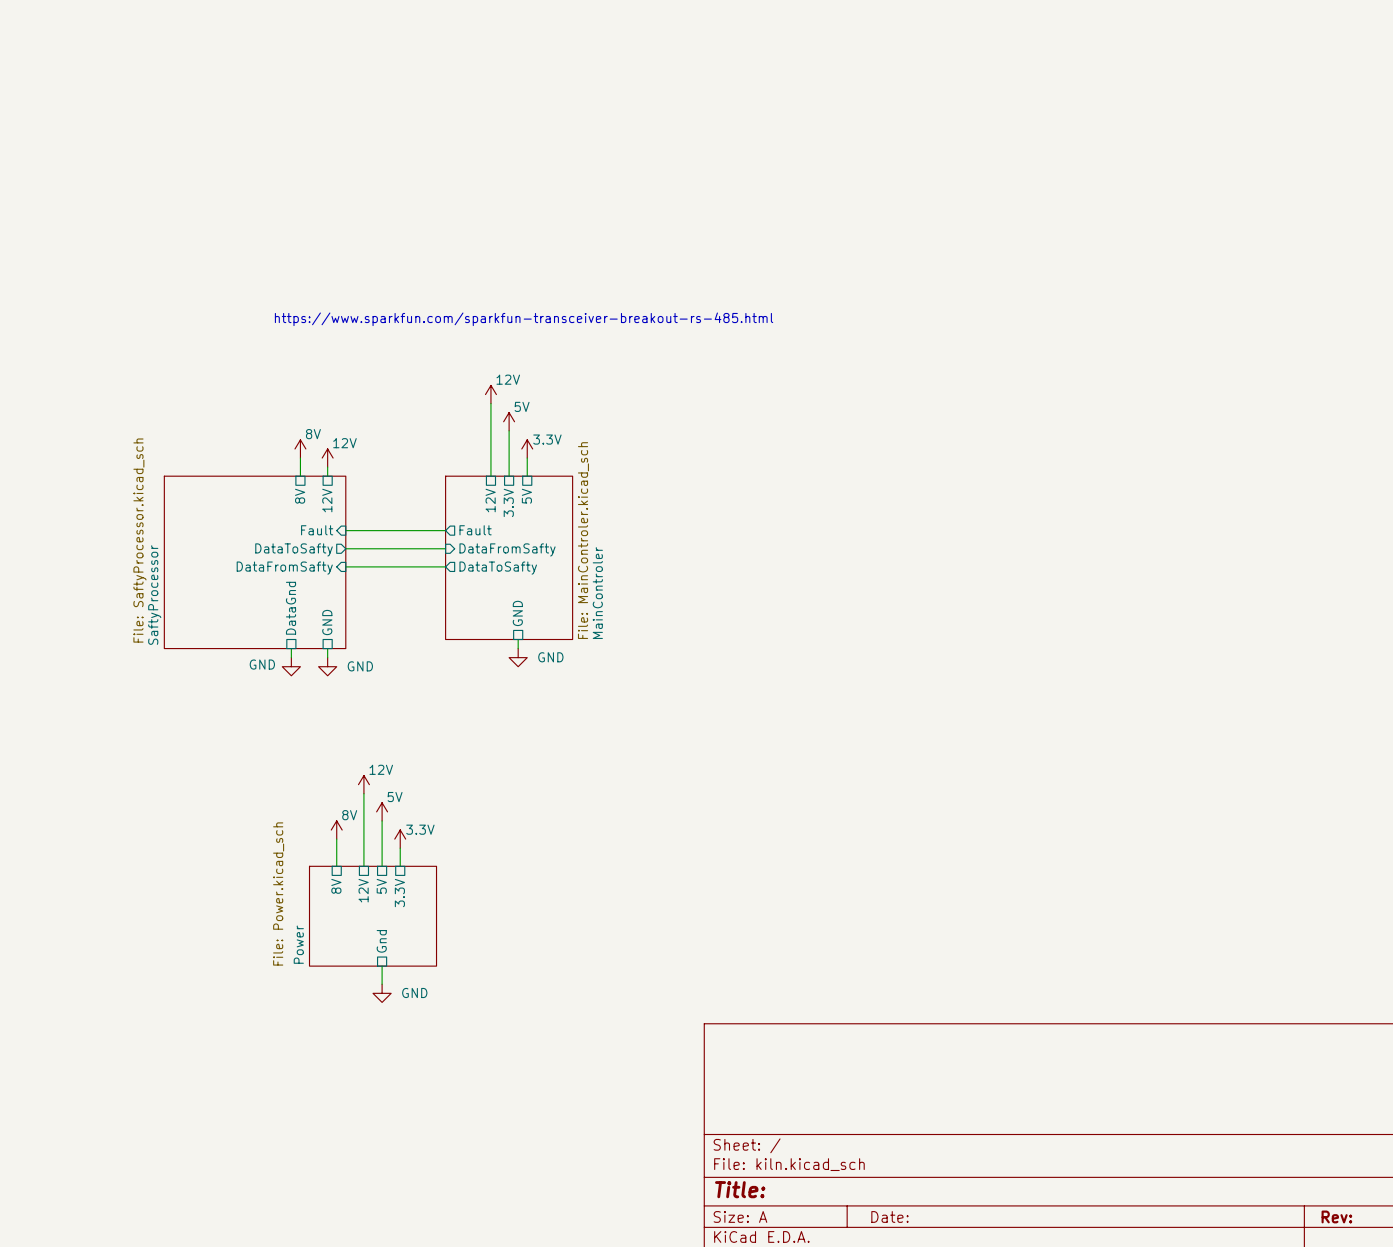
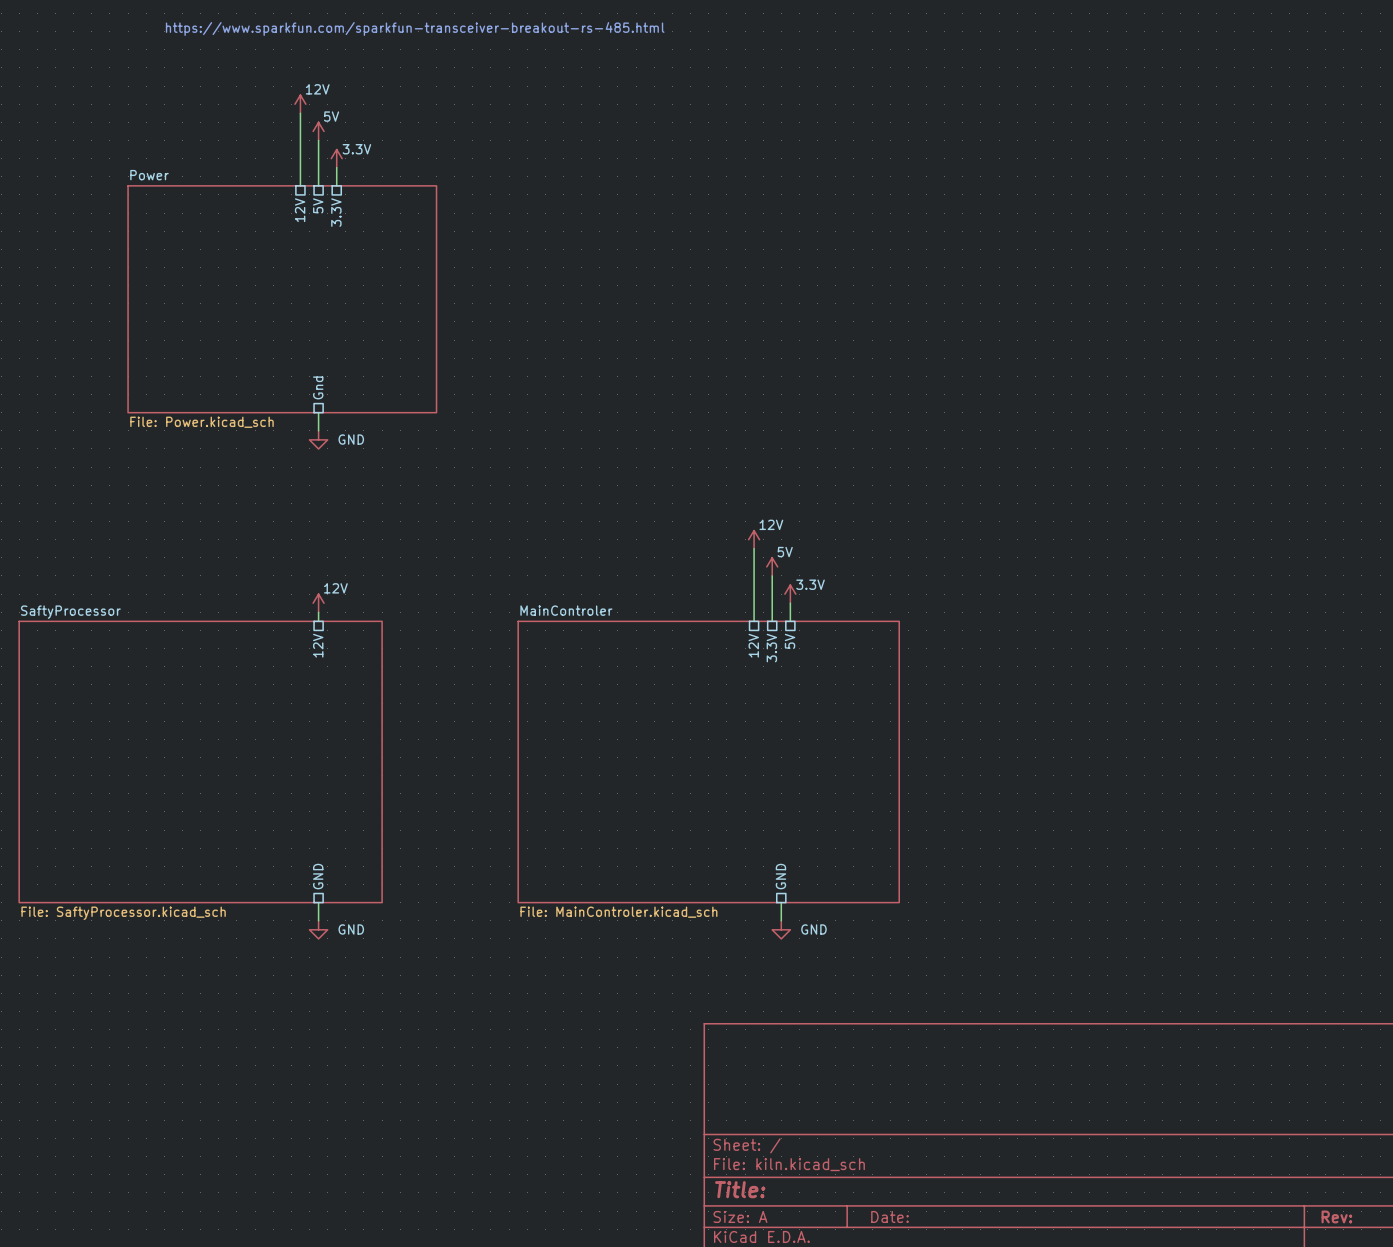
text: none -> https://www.sparkfun.com/sparkfun-transceiver-breakout-rs-485.html (415, 28)
power symbol: none -> 12V (300, 104)
wire: none -> (300, 113) (300, 185)
power symbol: none -> 5V (318, 131)
wire: none -> (318, 140) (318, 185)
power symbol: none -> 3.3V (336, 158)
wire: none -> (336, 167) (336, 185)
sheet pin: none -> 5V (318, 205)
sheet pin: none -> 12V (300, 210)
sheet pin: none -> 3.3V (336, 212)
sheet Power: none -> File: Power.kicad_sch (282, 299)
text: https://www.sparkfun.com/sparkfun-transceiver-breakout-rs-485.html (524, 319) -> none
sheet pin: none -> Gnd (318, 387)
power symbol: 12V (490, 394) -> none
wire: (490, 403) (490, 476) -> none
power symbol: 5V (509, 421) -> none
wire: (509, 430) (509, 476) -> none
power symbol: none -> GND (318, 439)
power symbol: 8V (300, 448) -> none
power symbol: 3.3V (527, 448) -> none
wire: (300, 458) (300, 476) -> (318, 412) (318, 430)
power symbol: 12V (327, 458) -> none
wire: (527, 458) (527, 476) -> none
wire: (327, 467) (327, 476) -> none
sheet pin: 8V (300, 496) -> none
sheet pin: 5V (526, 496) -> none
sheet pin: 12V (327, 500) -> none
sheet pin: 12V (490, 500) -> none
sheet pin: 3.3V (508, 502) -> none
sheet pin: Fault (317, 530) -> none
wire: (345, 530) (445, 530) -> none
sheet pin: Fault (475, 530) -> none
power symbol: none -> 12V (754, 539)
wire: (345, 548) (445, 548) -> none
wire: none -> (754, 548) (754, 621)
sheet pin: DataToSafty (294, 549) -> none
sheet pin: DataFromSafty (507, 549) -> none
sheet MainControler: File: MainControler.kicad_sch (509, 557) -> none
sheet SaftyProcessor: File: SaftyProcessor.kicad_sch (255, 562) -> none
wire: (345, 566) (445, 566) -> none
power symbol: none -> 5V (772, 566)
sheet pin: DataFromSafty (284, 568) -> none
sheet pin: DataToSafty (498, 568) -> none
wire: none -> (772, 575) (772, 621)
power symbol: none -> 3.3V (790, 594)
power symbol: none -> 12V (318, 603)
wire: none -> (790, 603) (790, 621)
sheet pin: DataGnd (291, 608) -> none
sheet pin: GND (517, 613) -> none
sheet pin: GND (327, 622) -> none
sheet pin: none -> 5V (790, 641)
sheet pin: none -> 12V (318, 645)
sheet pin: none -> 12V (753, 645)
wire: (291, 648) (291, 657) -> none
wire: (327, 648) (327, 657) -> (318, 612) (318, 621)
sheet pin: none -> 3.3V (771, 648)
power symbol: GND (518, 657) -> none
power symbol: GND (291, 666) -> none
power symbol: GND (327, 666) -> none
sheet SaftyProcessor: none -> File: SaftyProcessor.kicad_sch (200, 761)
sheet MainControler: none -> File: MainControler.kicad_sch (708, 761)
power symbol: 12V (363, 784) -> none
wire: (363, 793) (363, 866) -> none
power symbol: 5V (382, 811) -> none
power symbol: 8V (336, 830) -> none
wire: (336, 839) (336, 866) -> none
power symbol: 3.3V (400, 839) -> none
wire: (400, 848) (400, 866) -> none
sheet pin: none -> GND (318, 876)
sheet pin: none -> GND (780, 876)
sheet pin: 8V (336, 886) -> none
sheet pin: 5V (381, 886) -> none
sheet pin: 12V (363, 890) -> none
sheet pin: 3.3V (399, 893) -> none
wire: none -> (781, 902) (781, 920)
sheet Power: File: Power.kicad_sch (373, 916) -> none
power symbol: none -> GND (781, 929)
sheet pin: Gnd (381, 941) -> none
wire: (382, 966) (382, 984) -> (318, 902) (318, 920)
power symbol position: GND (382, 993) -> GND (318, 929)

